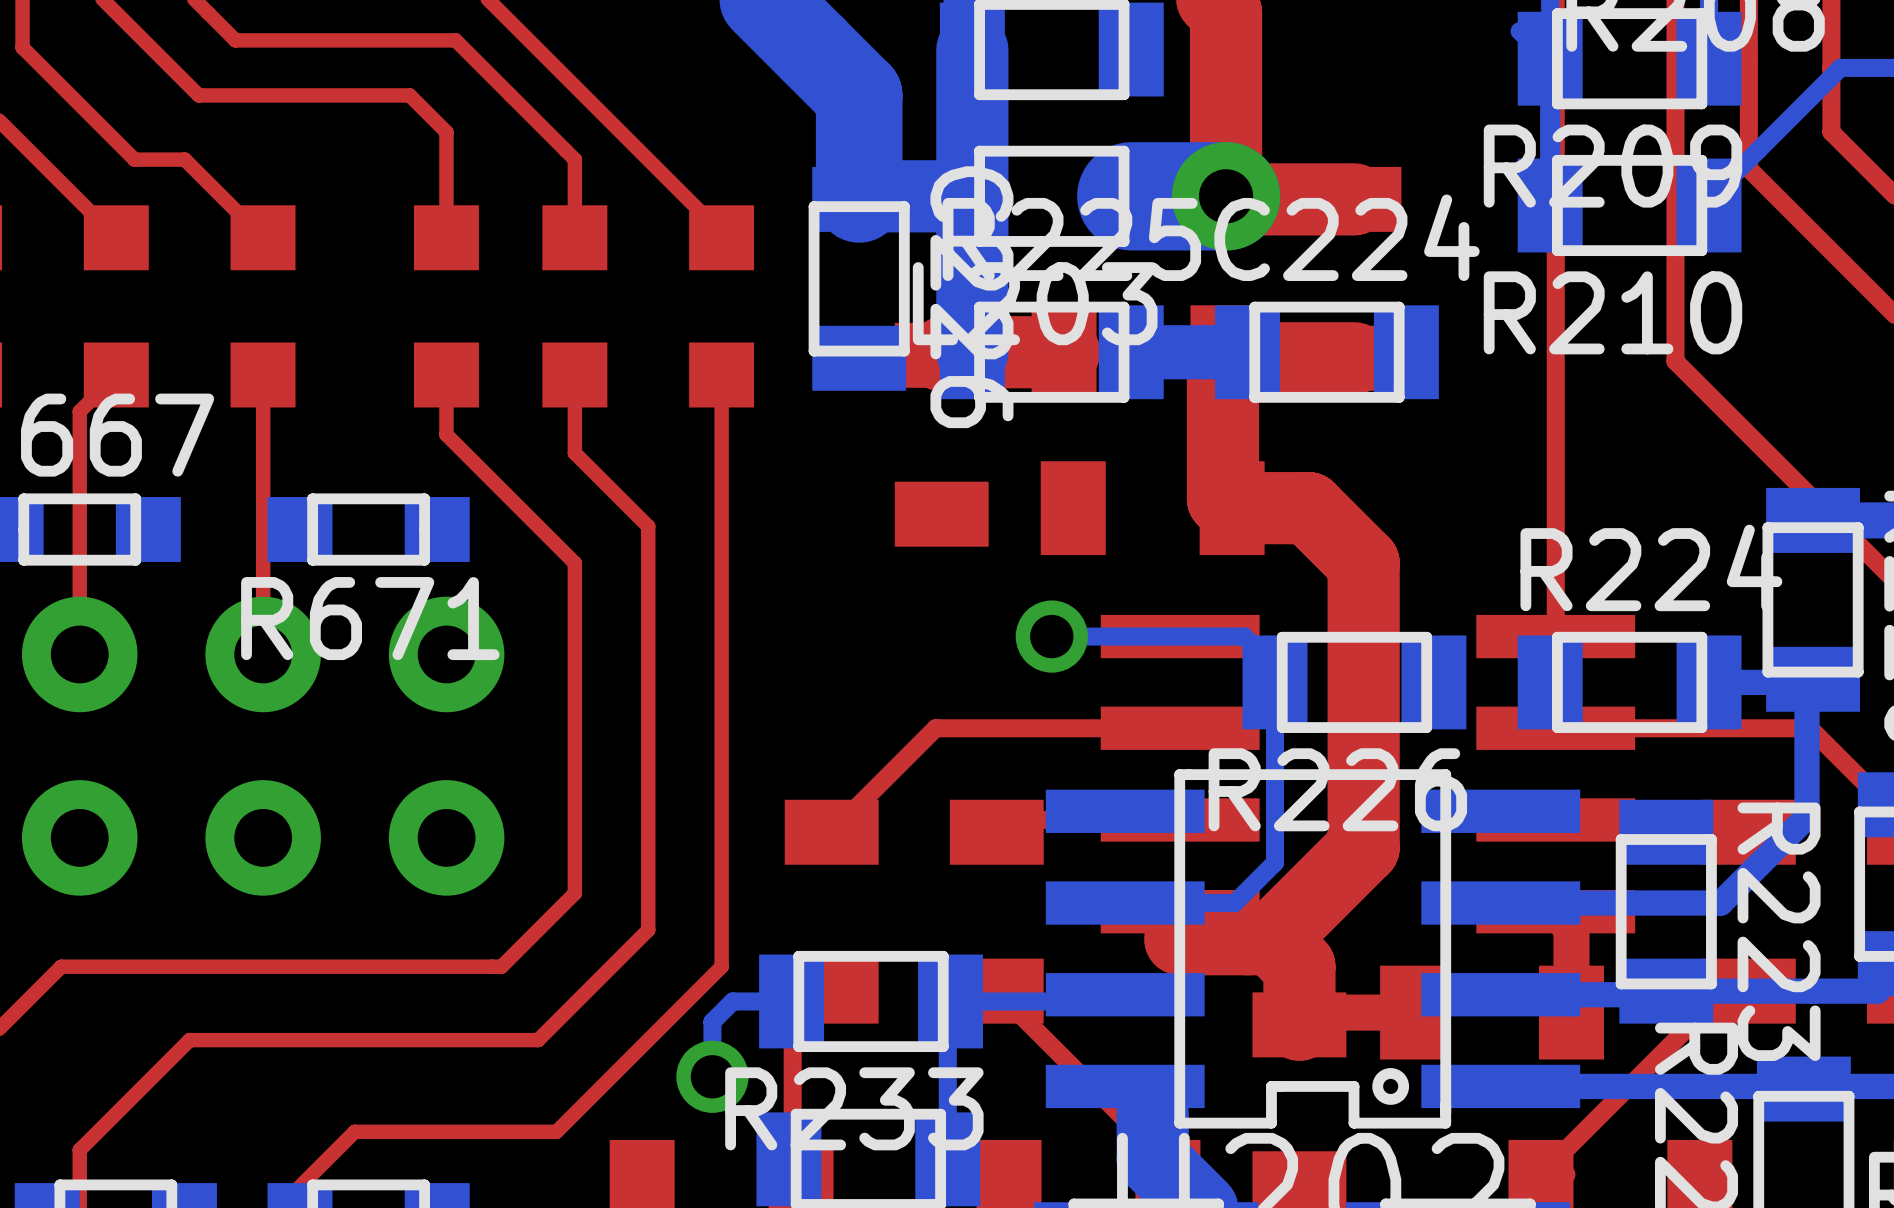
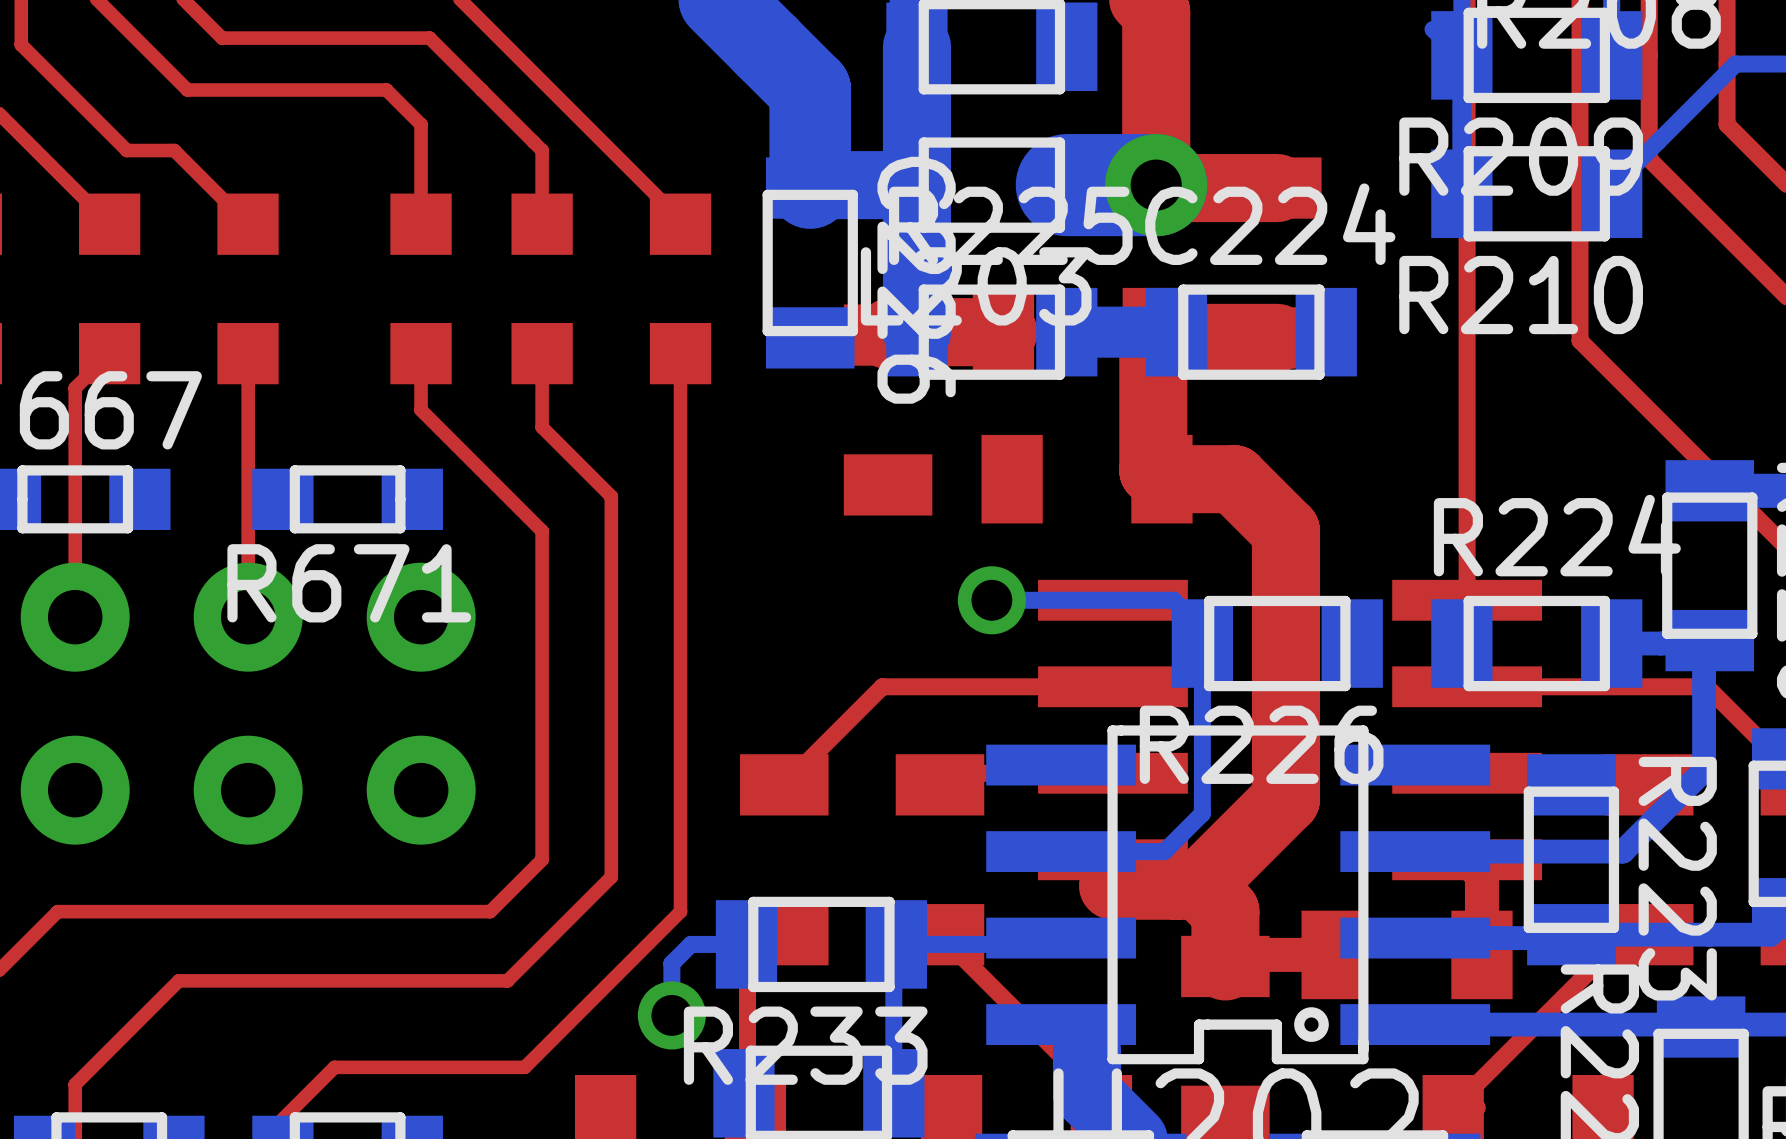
top track: (574, 893) (501, 966) -> (542, 842) (542, 859) (490, 911) (472, 911)

